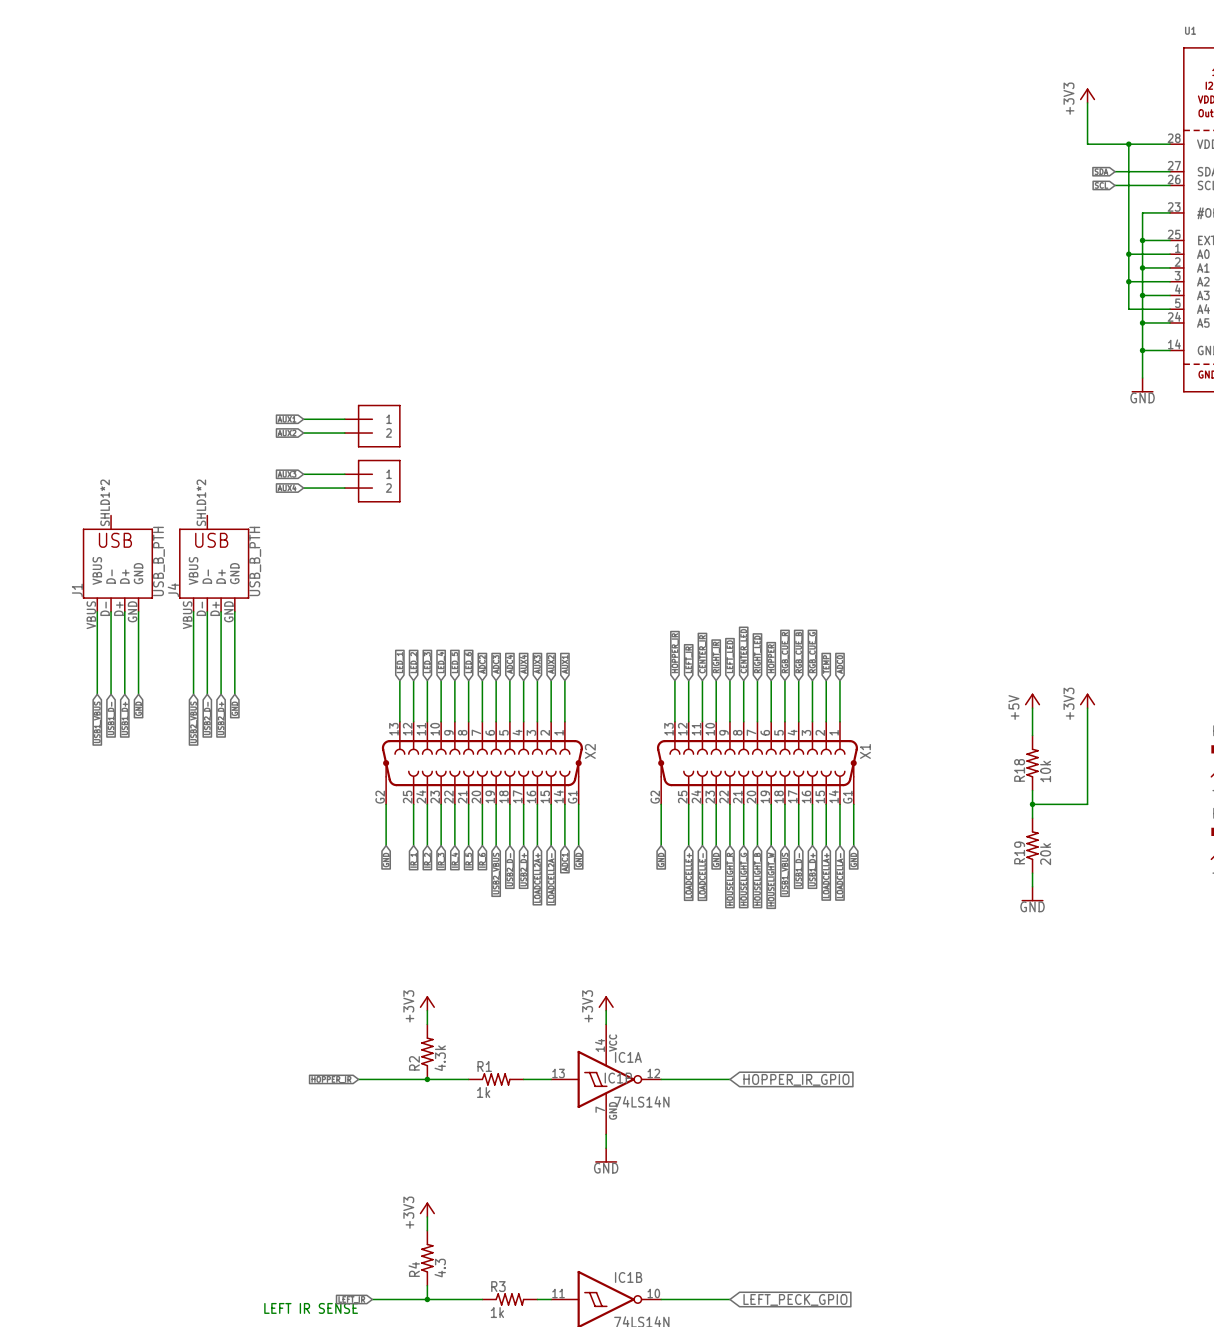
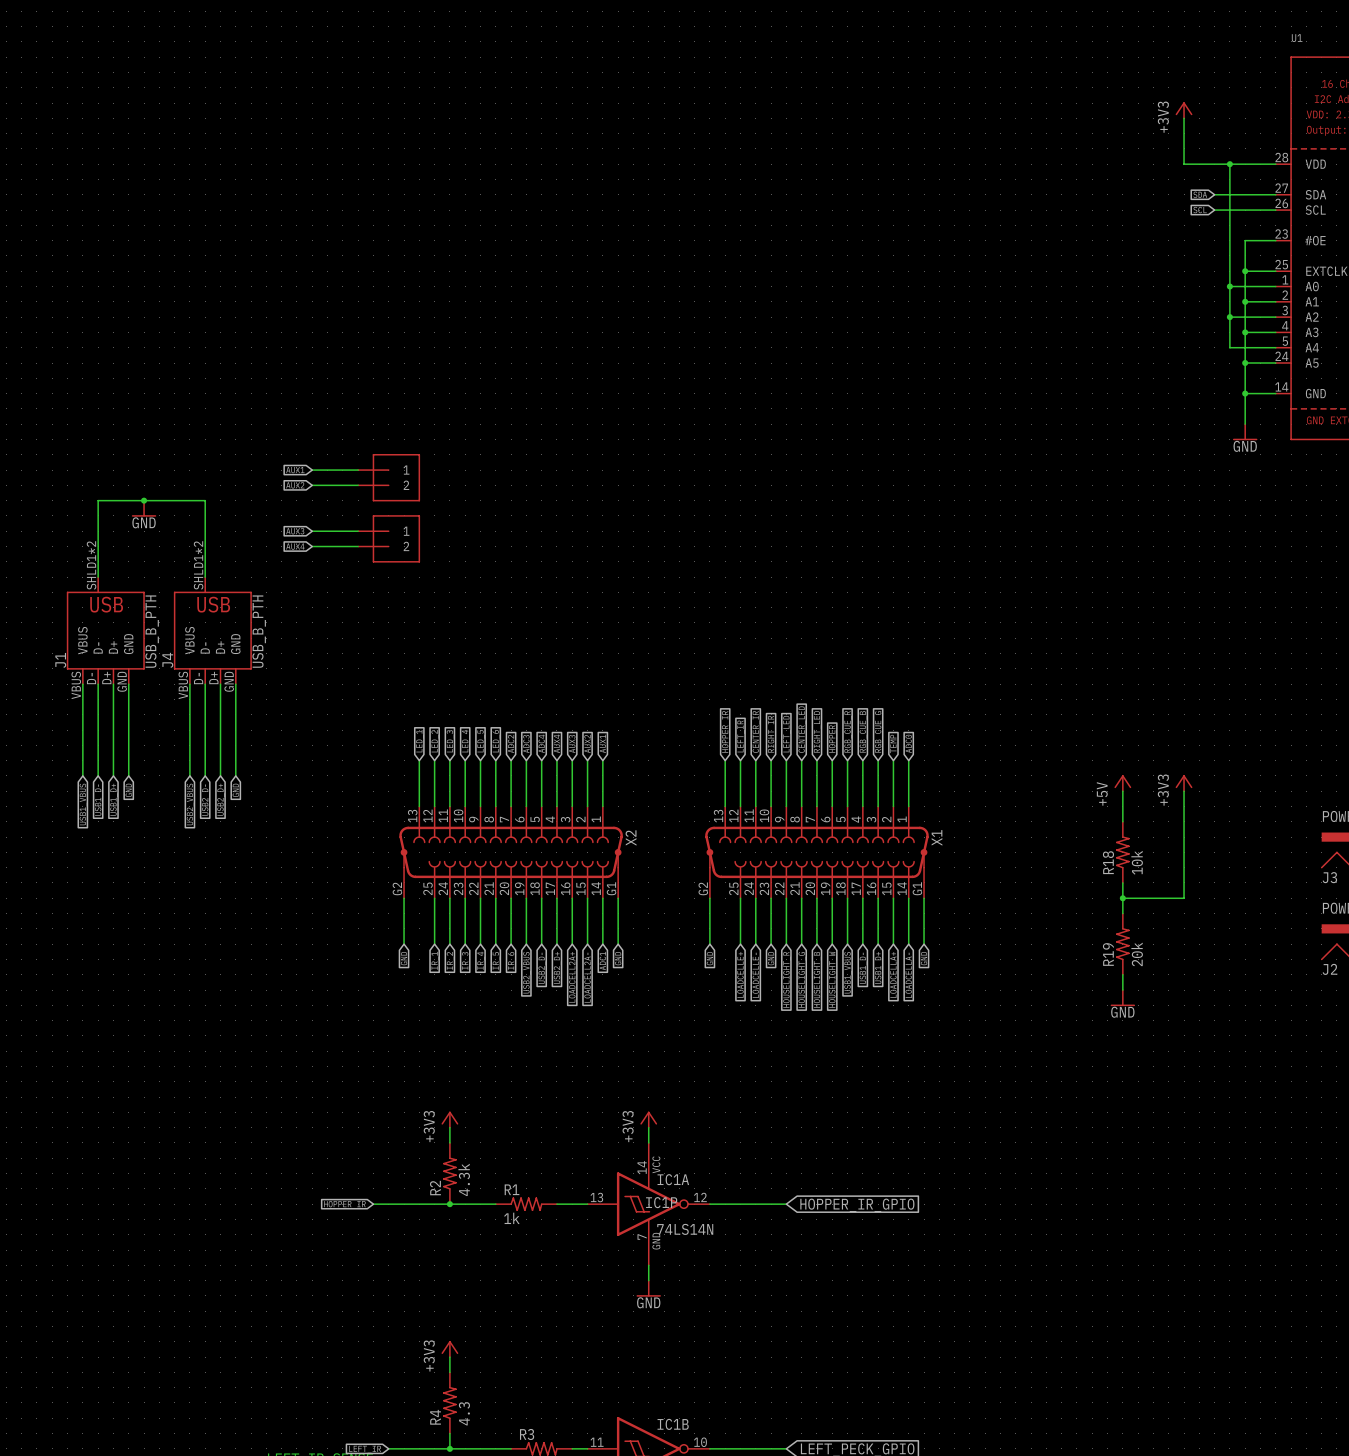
junction: none -> (144, 500)
power symbol: none -> GND (144, 508)
wire: none -> (98, 577) (98, 500) (205, 500) (205, 577)

